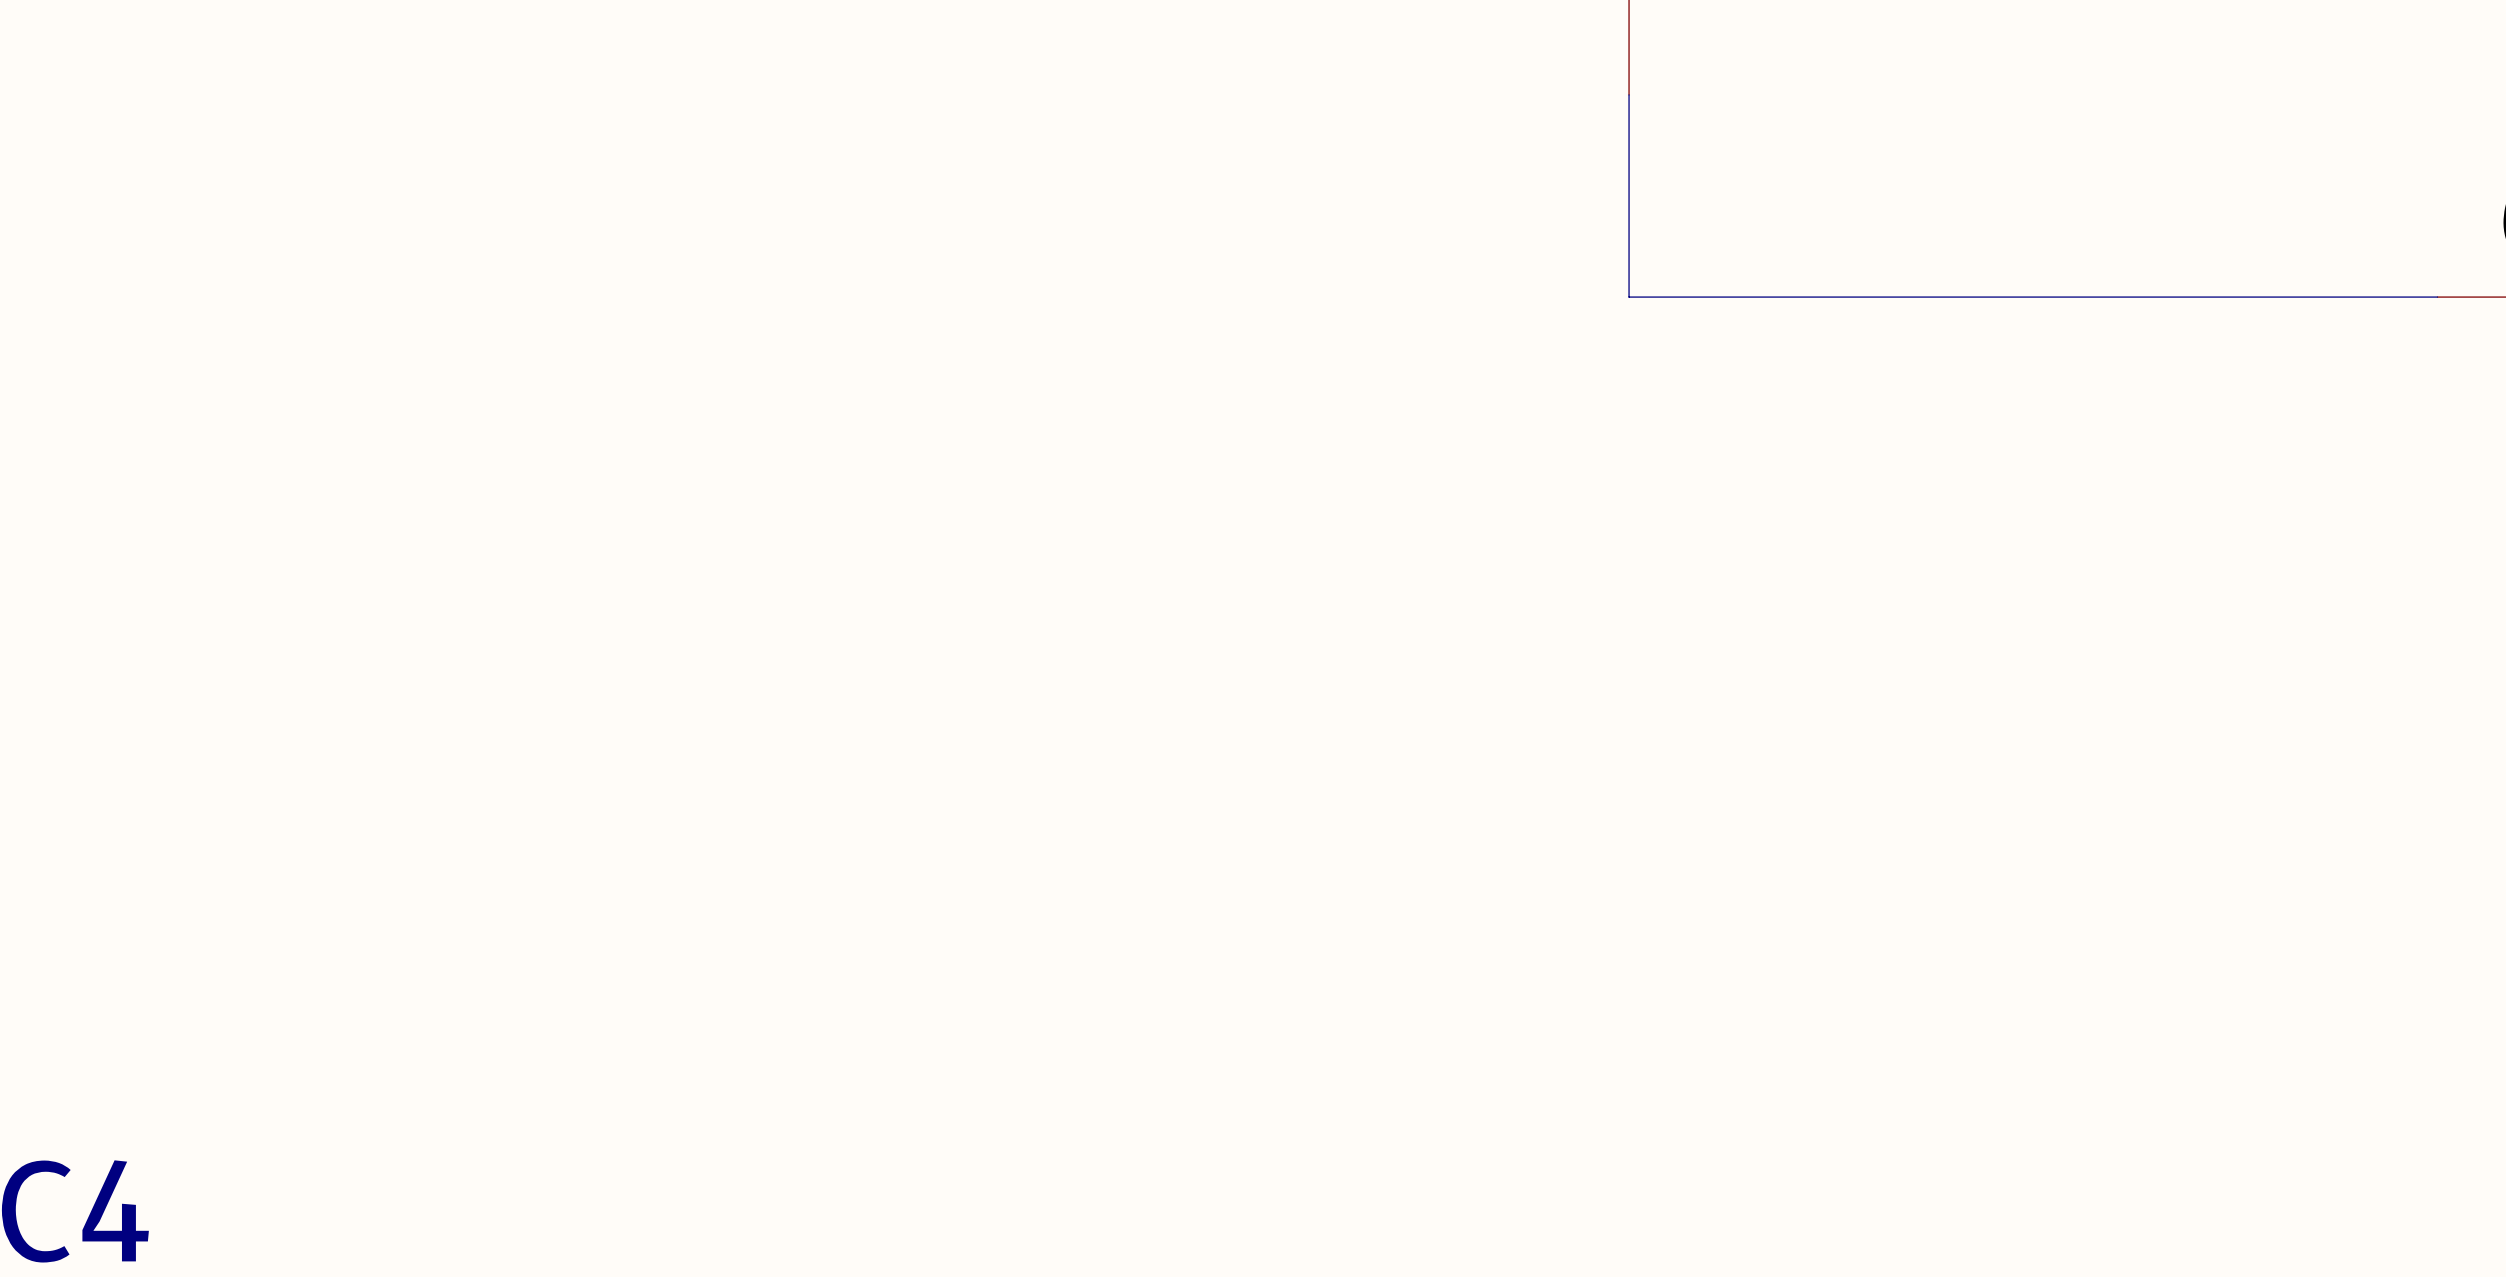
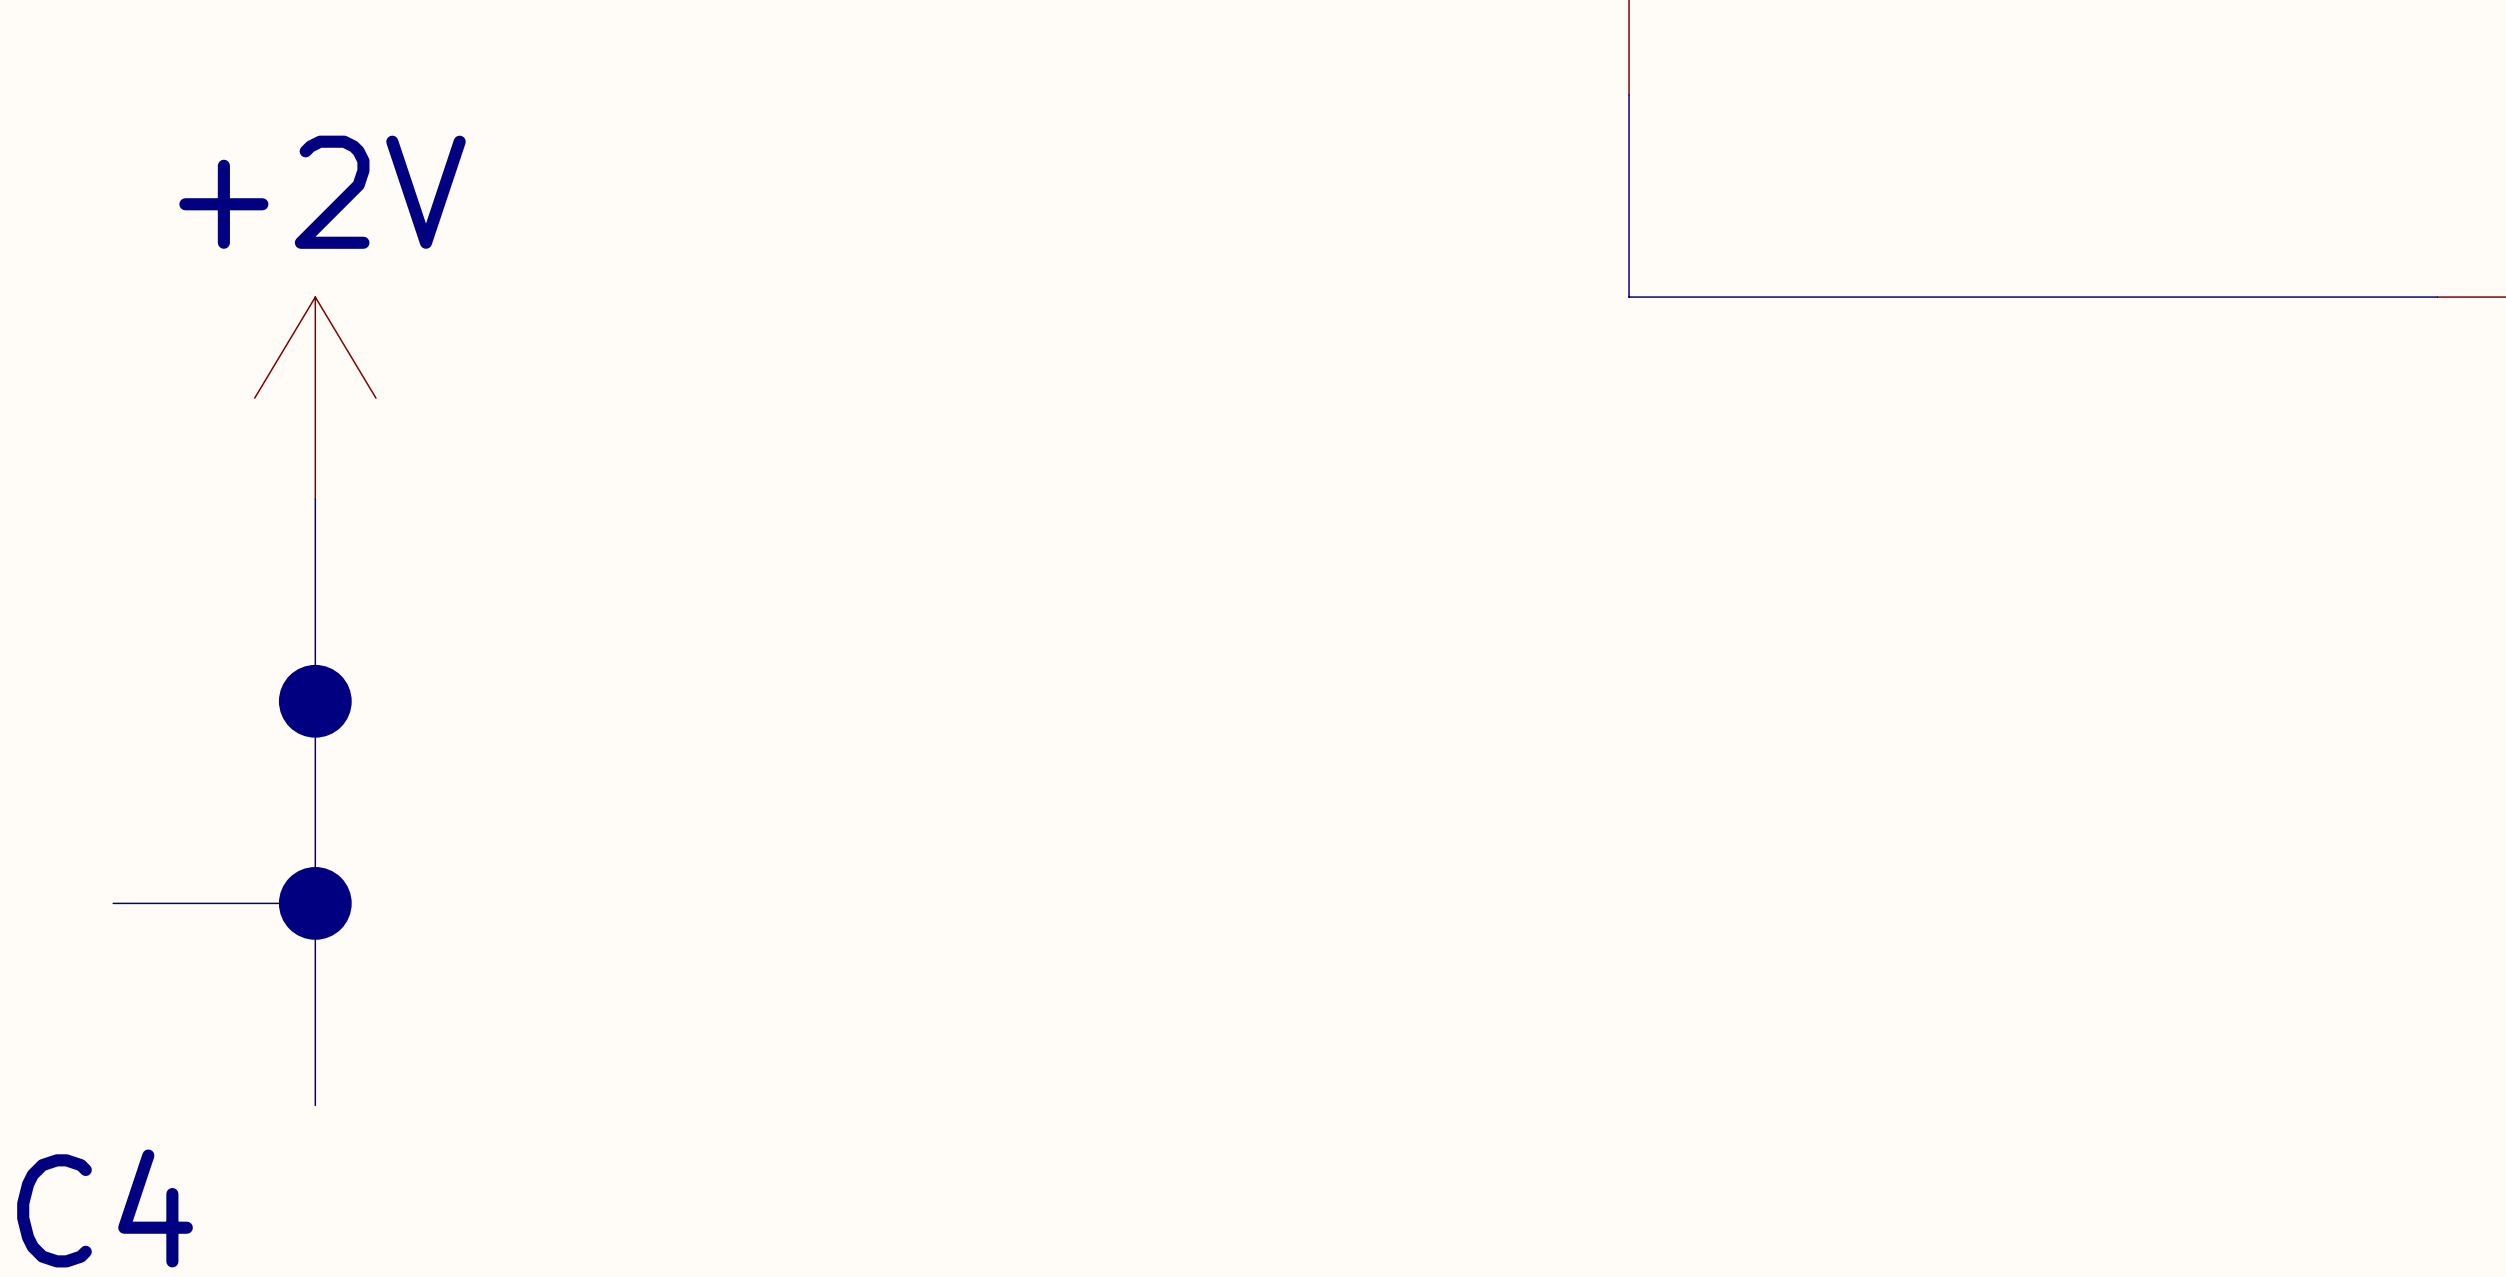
power symbol: none -> +2V (315, 398)
wire: none -> (315, 499) (315, 1105)
junction: none -> (315, 701)
wire: none -> (113, 903) (315, 903)
junction: none -> (315, 903)

